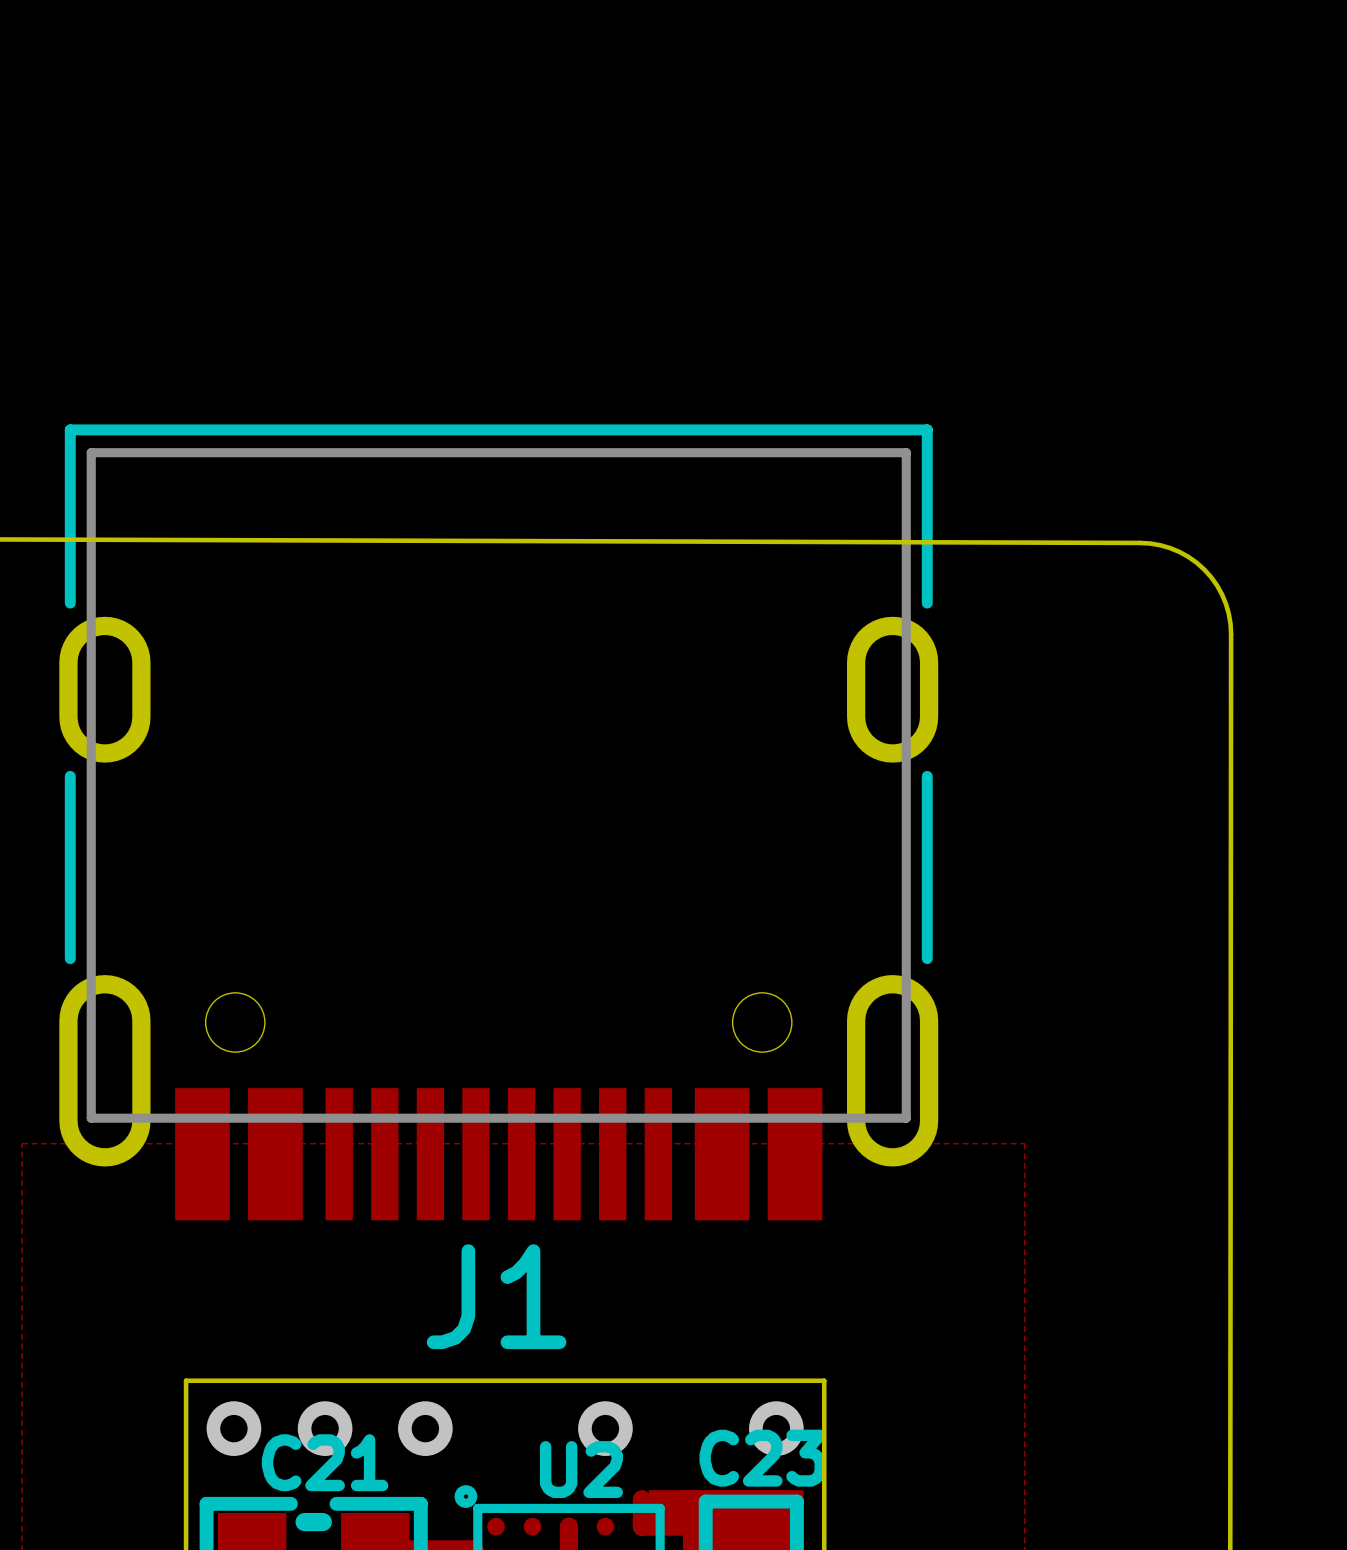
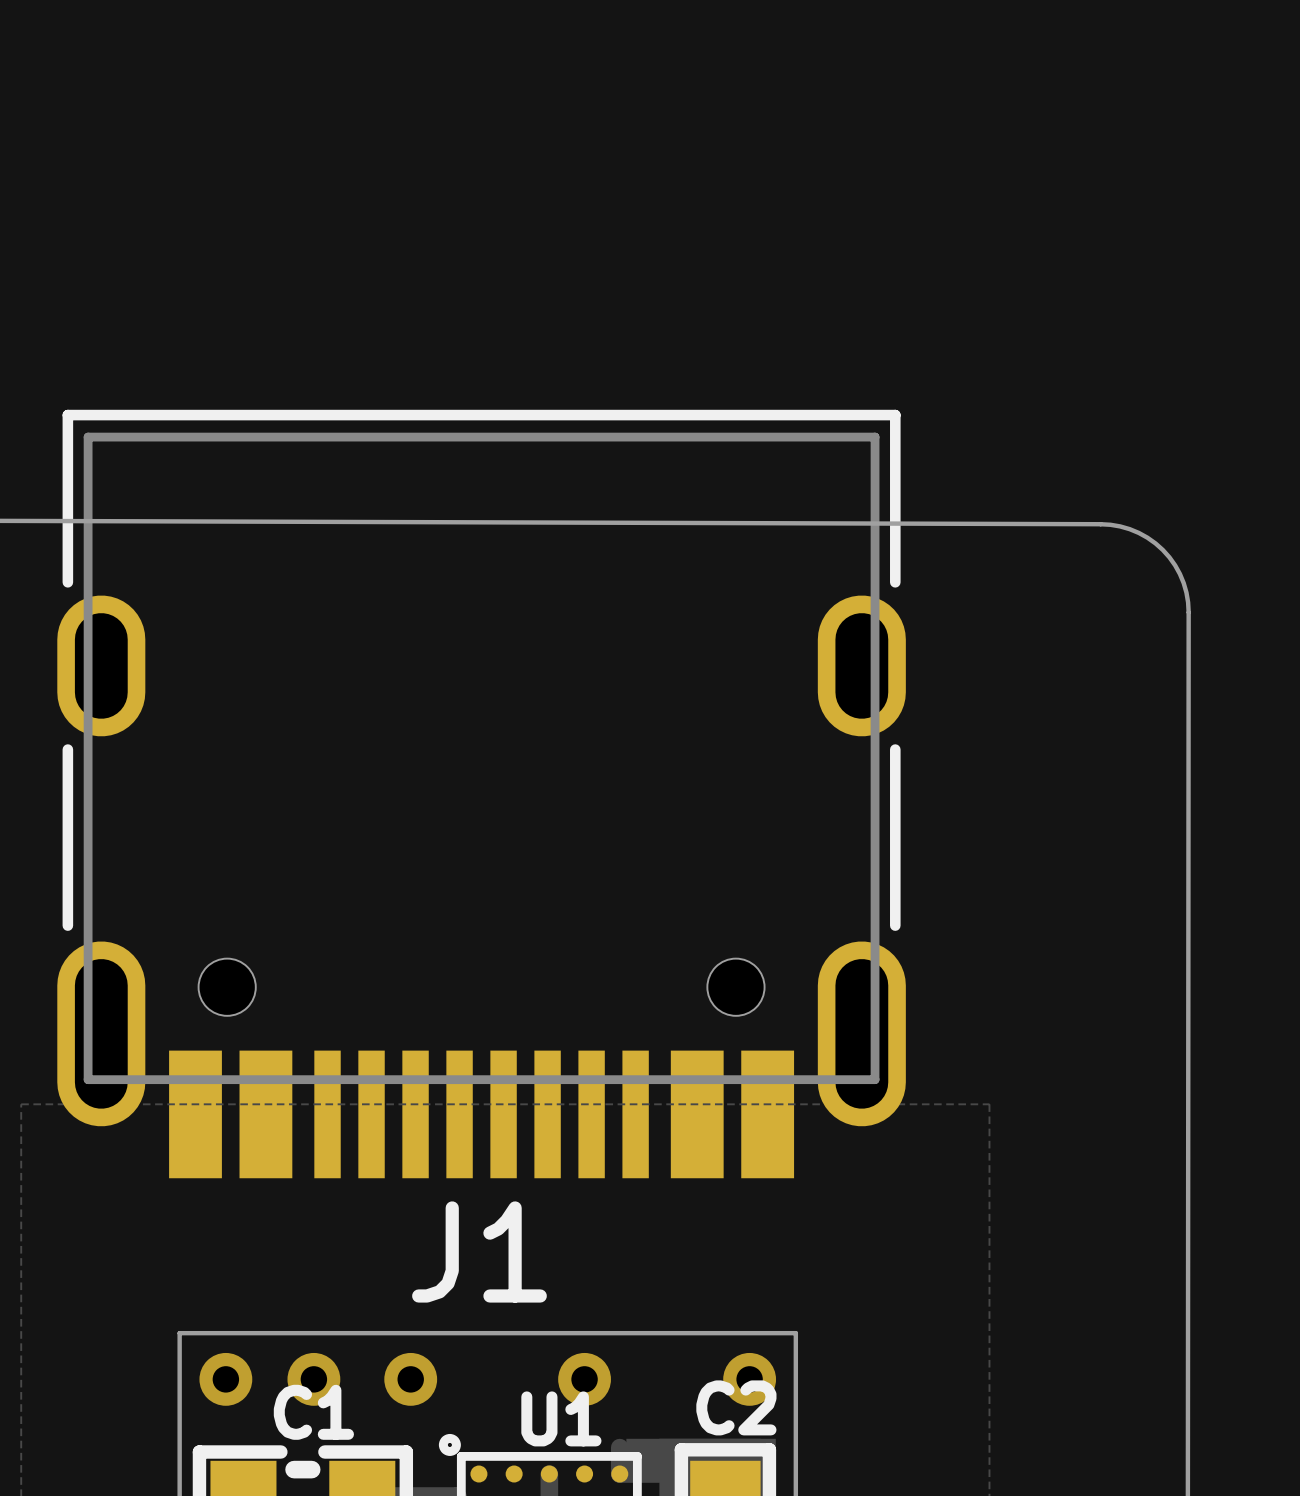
C23 name: C23 (762, 1458) -> C2 (736, 1407)
C21 name: C21 (325, 1462) -> C1 (313, 1412)
U2 name: U2 (581, 1469) -> U1 (561, 1418)

